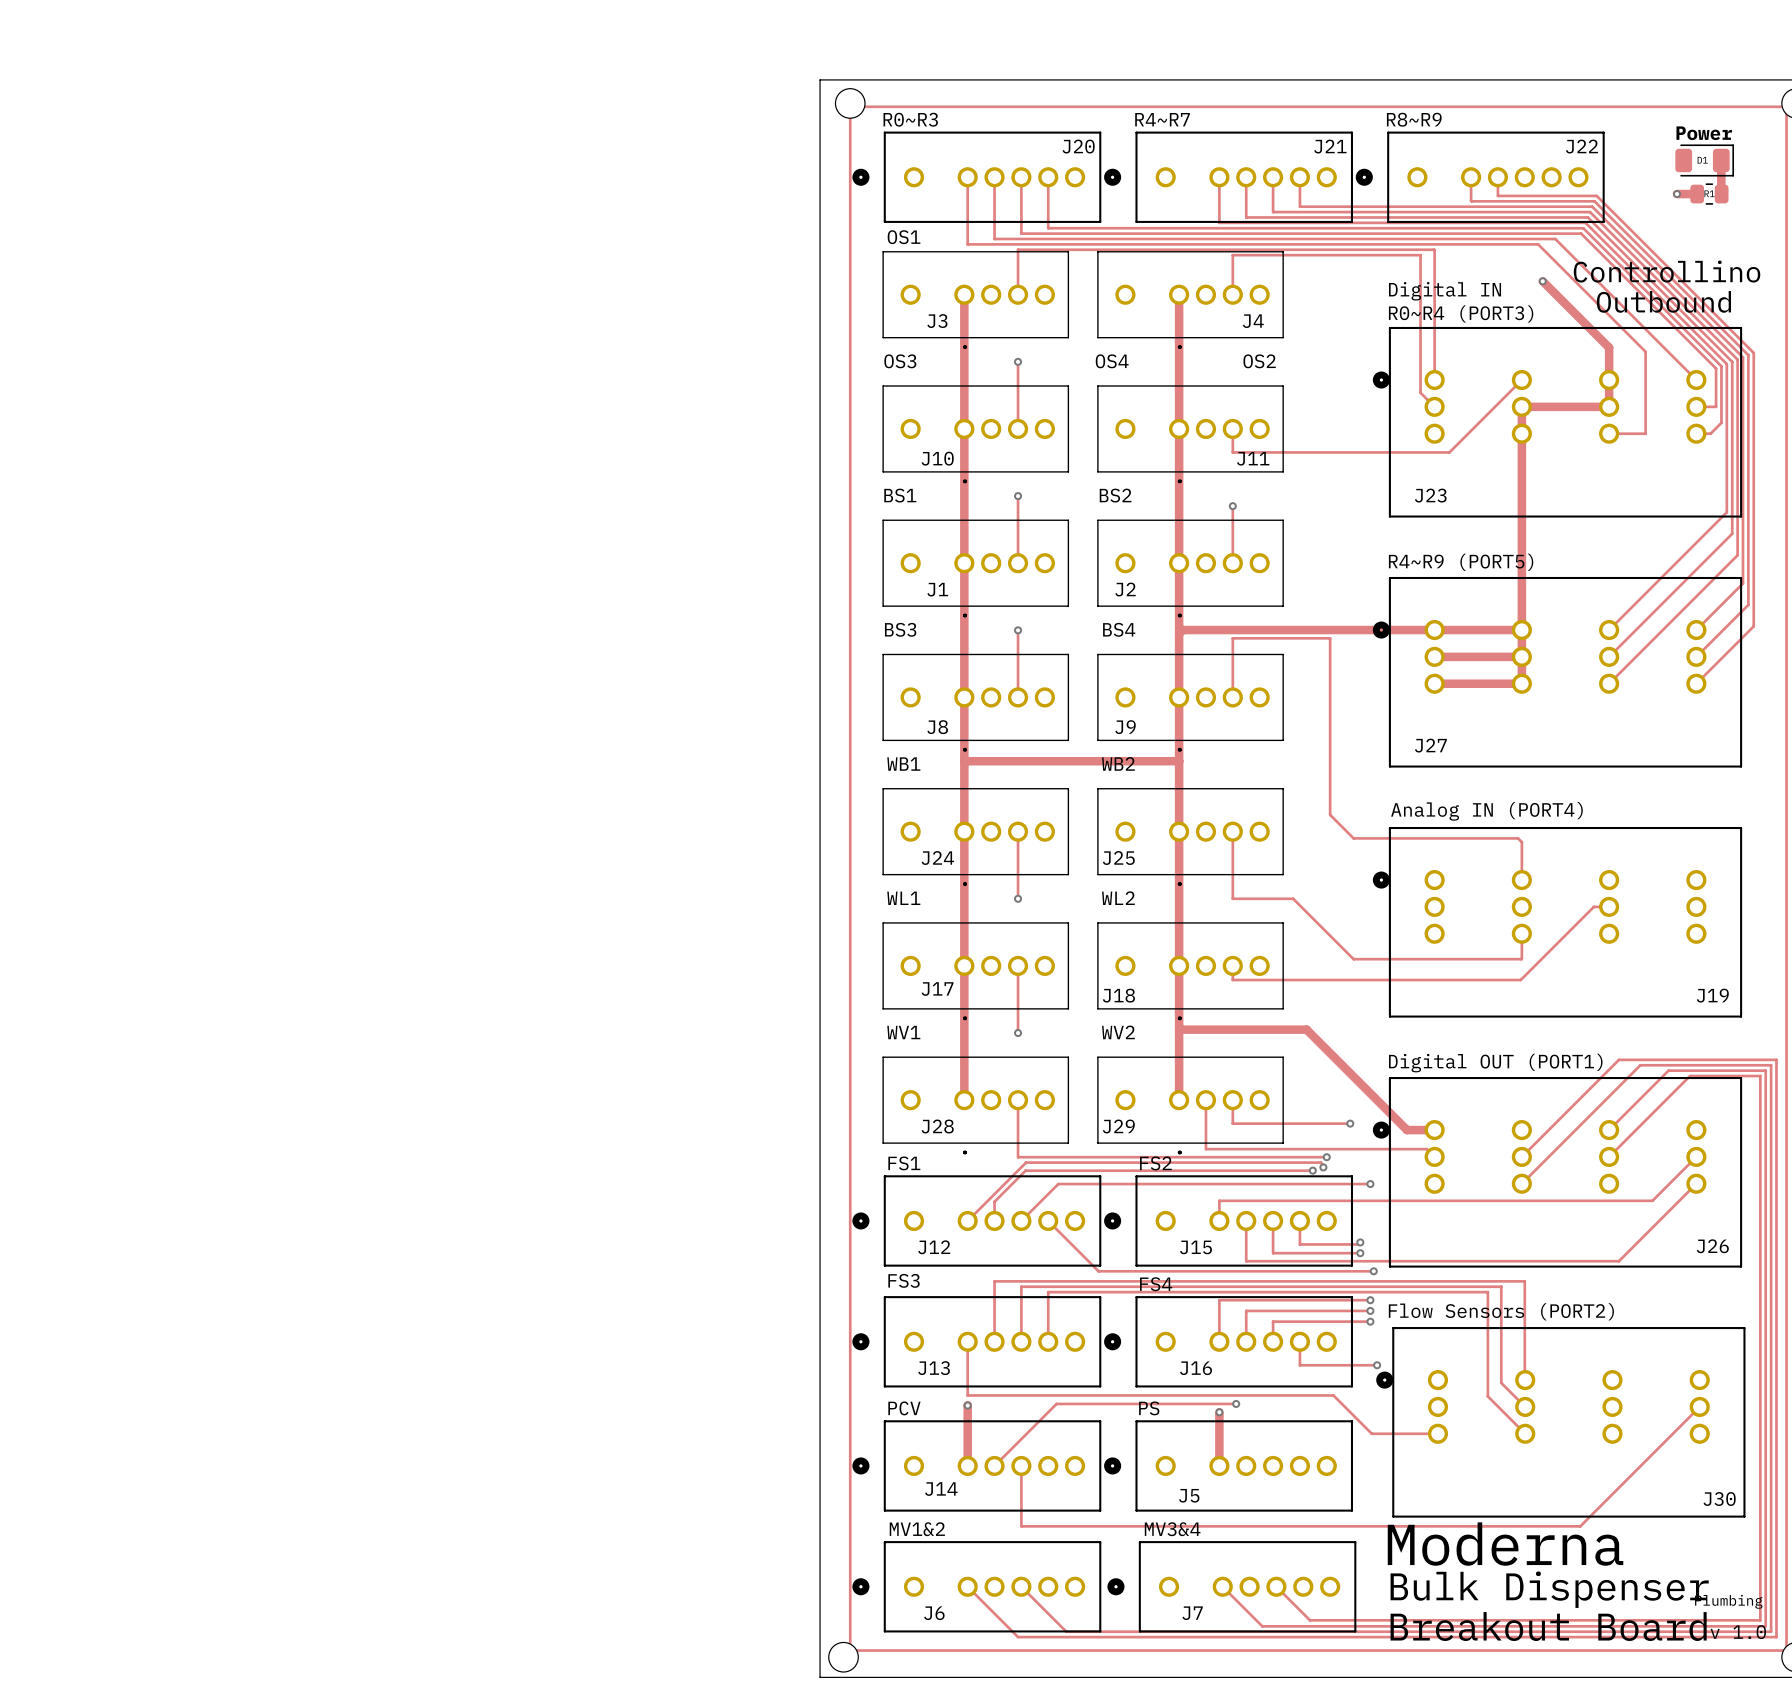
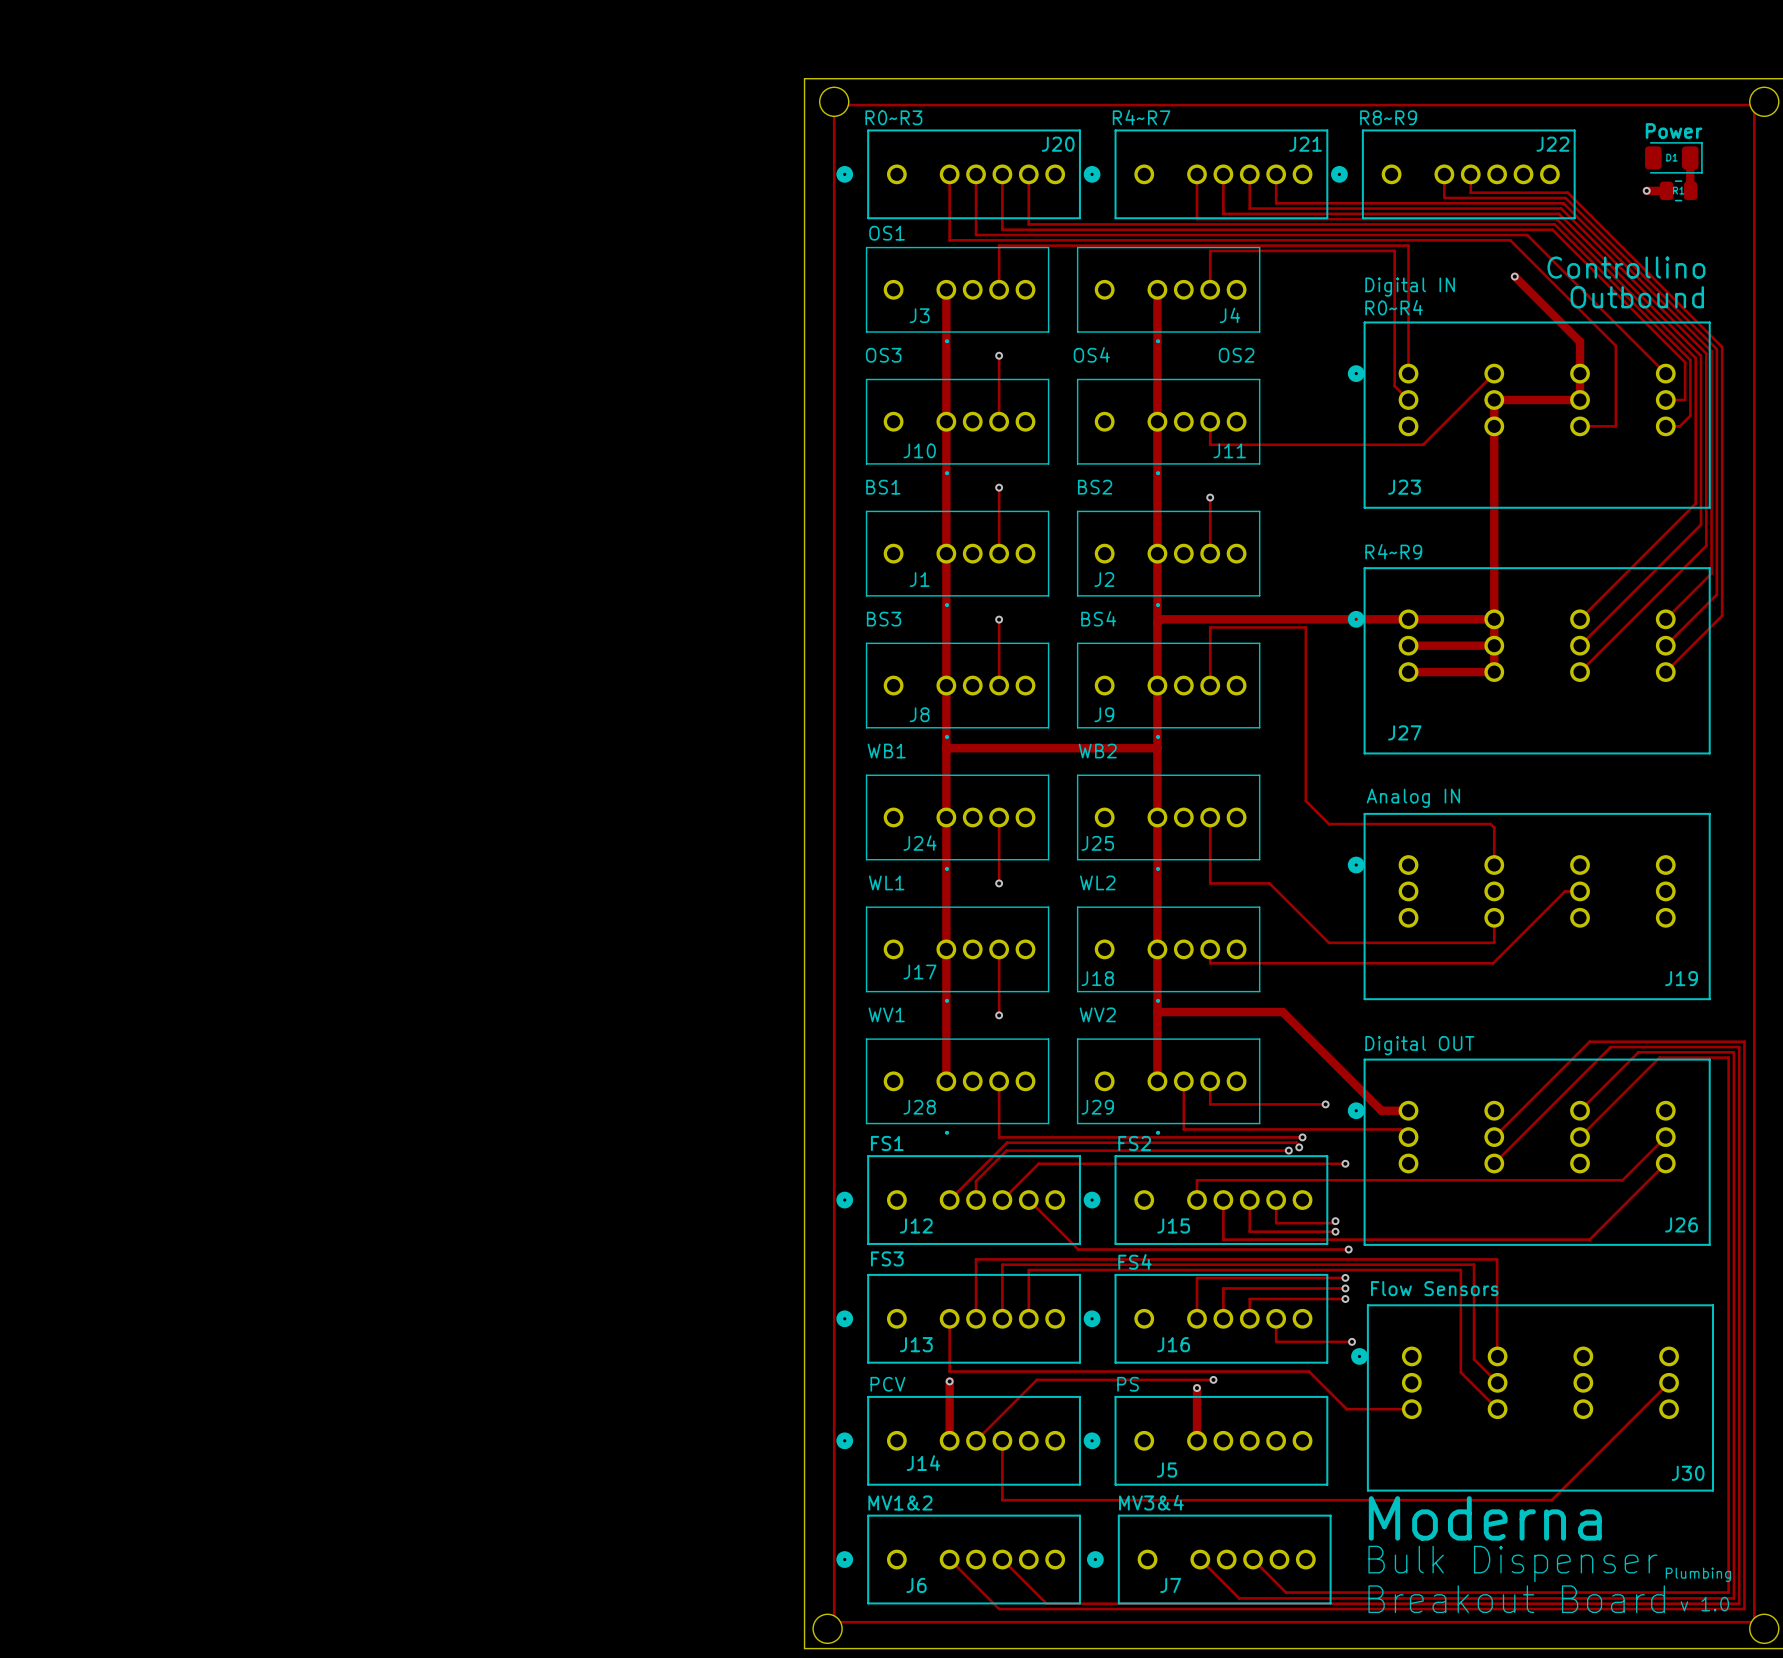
text: R0~R4 (PORT3) (1461, 313) -> R0~R4 (1394, 307)
text: R4~R9 (PORT5) (1461, 562) -> R4~R9 (1393, 551)
text: Analog IN (PORT4) (1486, 811) -> Analog IN (1413, 798)
text: Digital OUT (PORT1) (1495, 1063) -> Digital OUT (1419, 1045)
J30 value: Flow Sensors (PORT2) (1501, 1311) -> Flow Sensors (1434, 1288)

